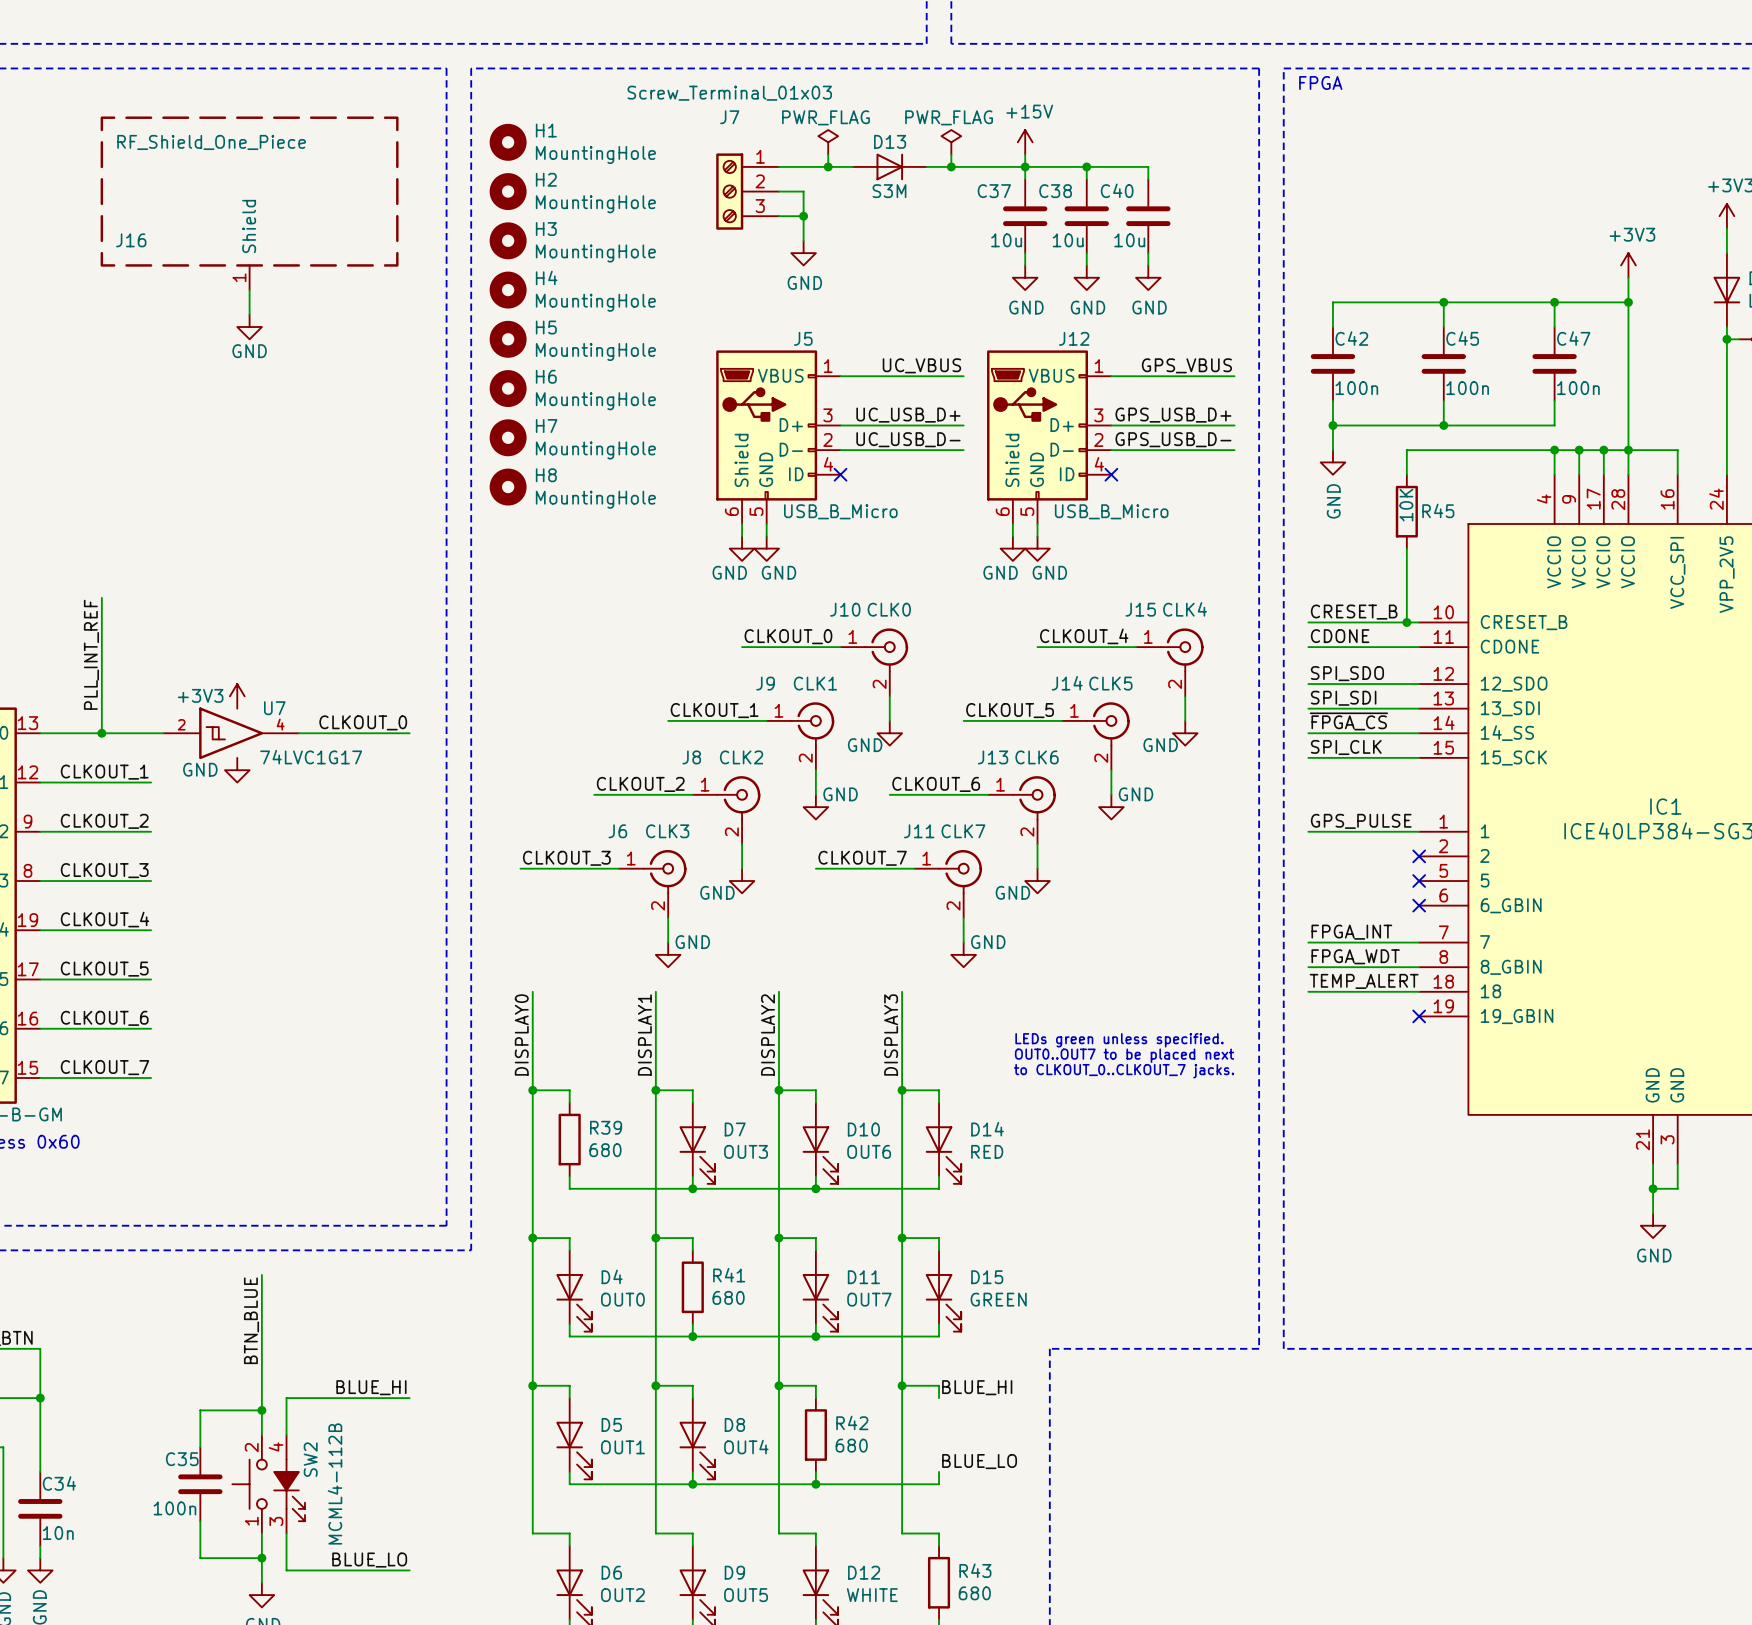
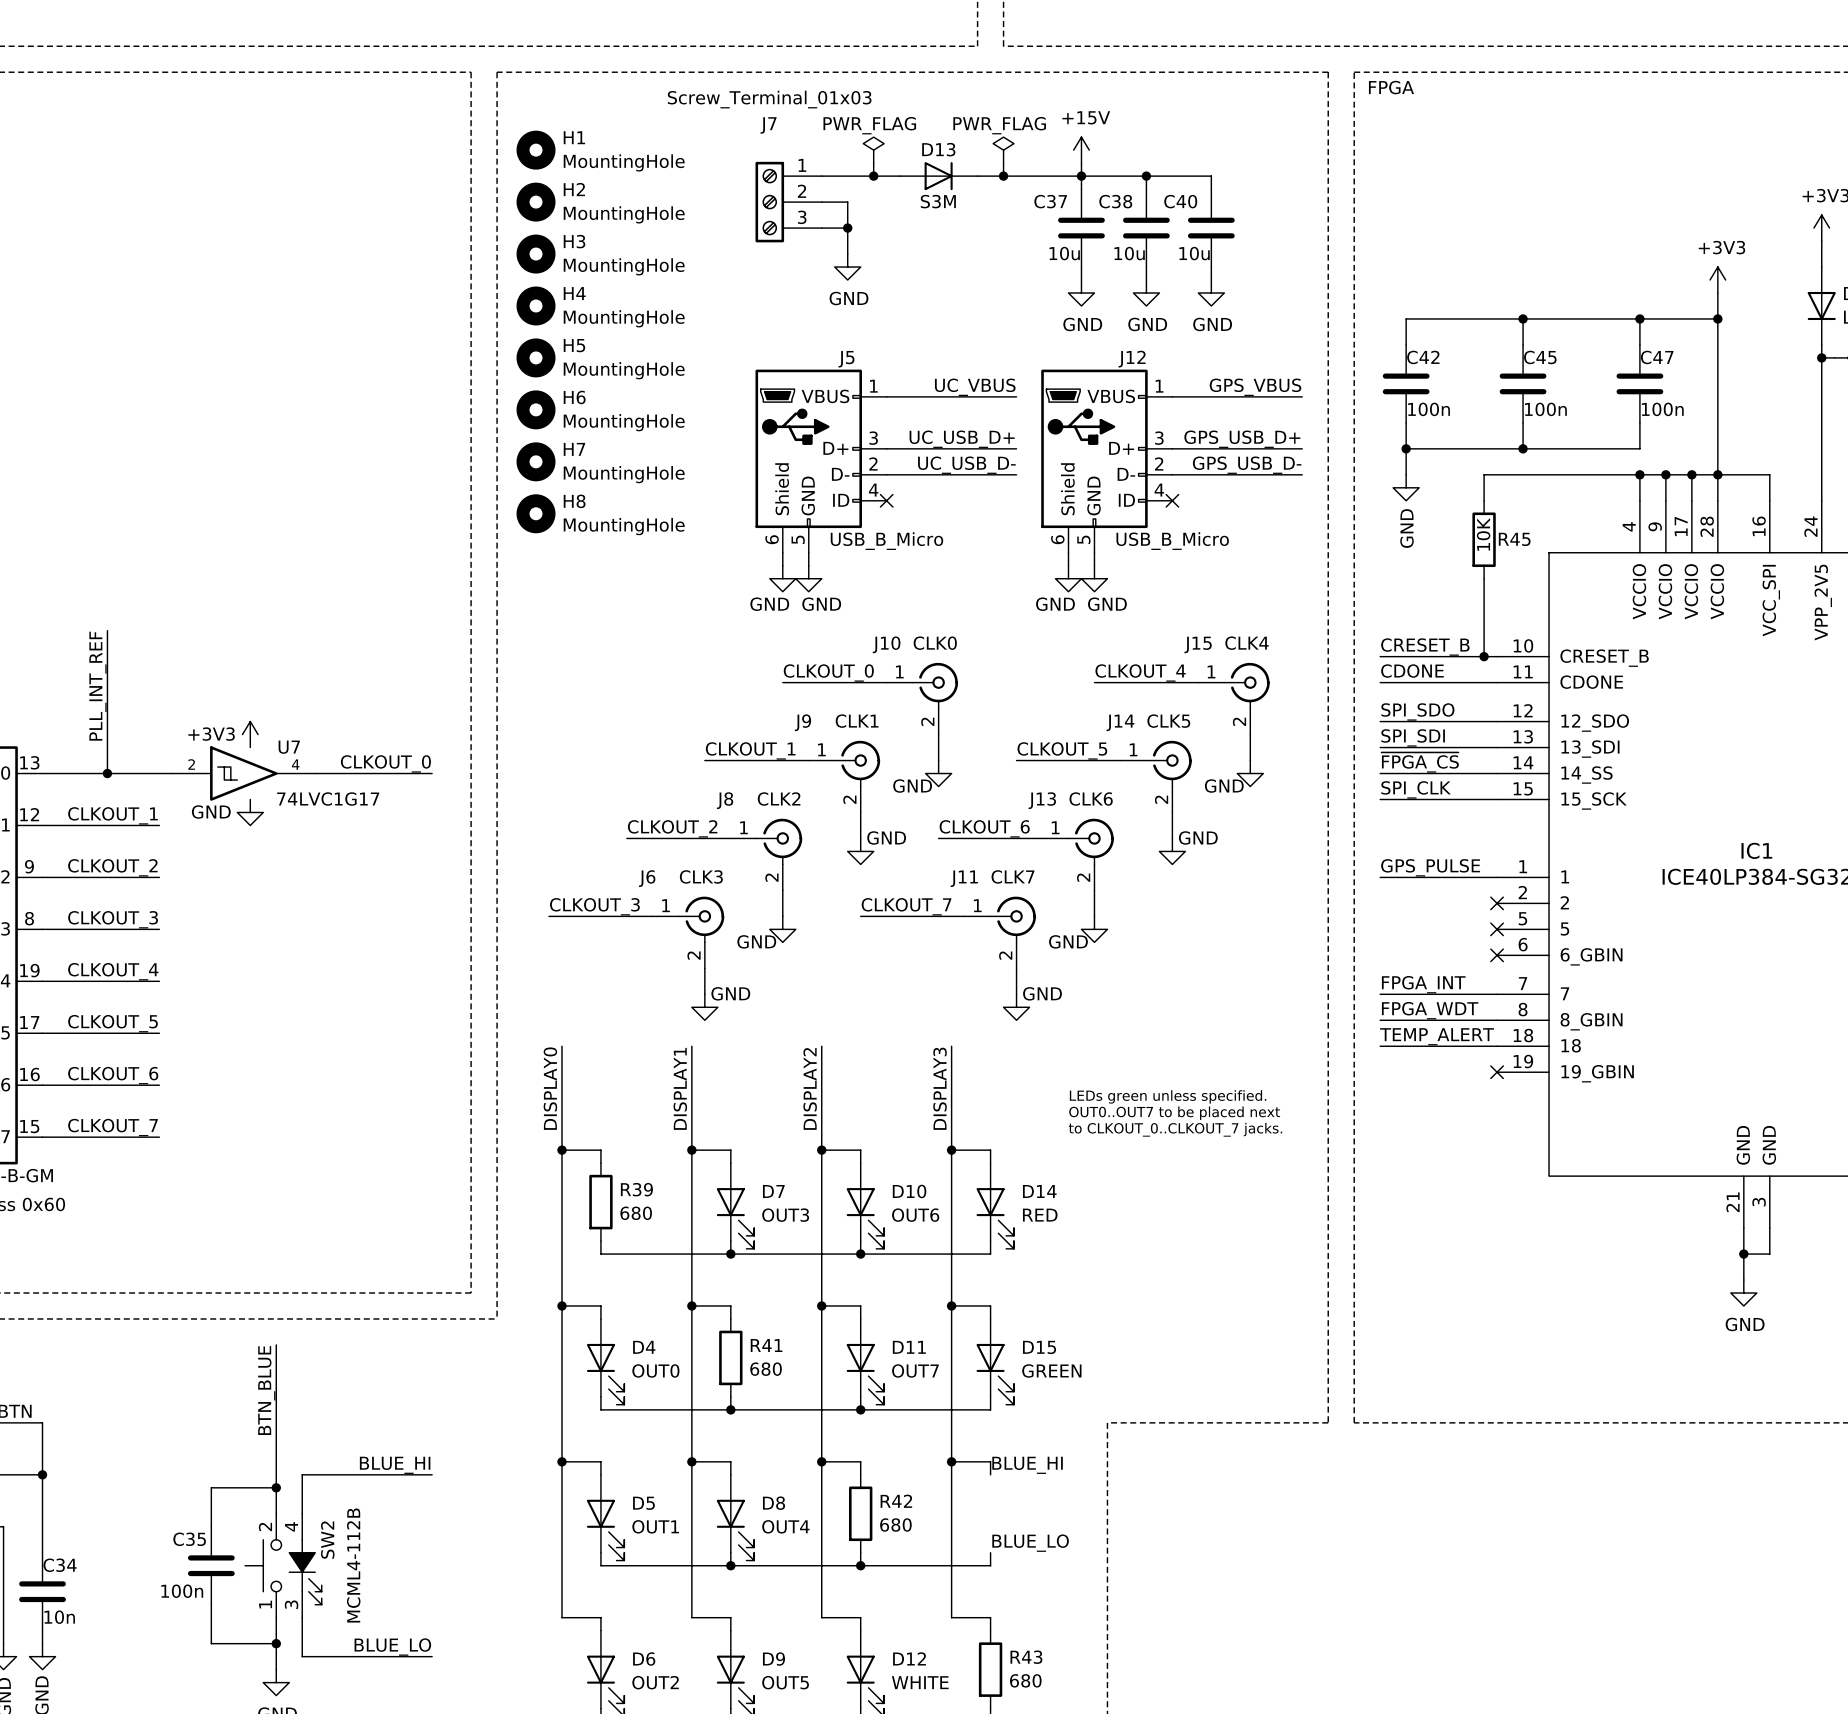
J16: RF_Shield_One_Piece (249, 203) -> none
wire: (249, 290) (249, 314) -> none
power symbol: GND (249, 327) -> none

